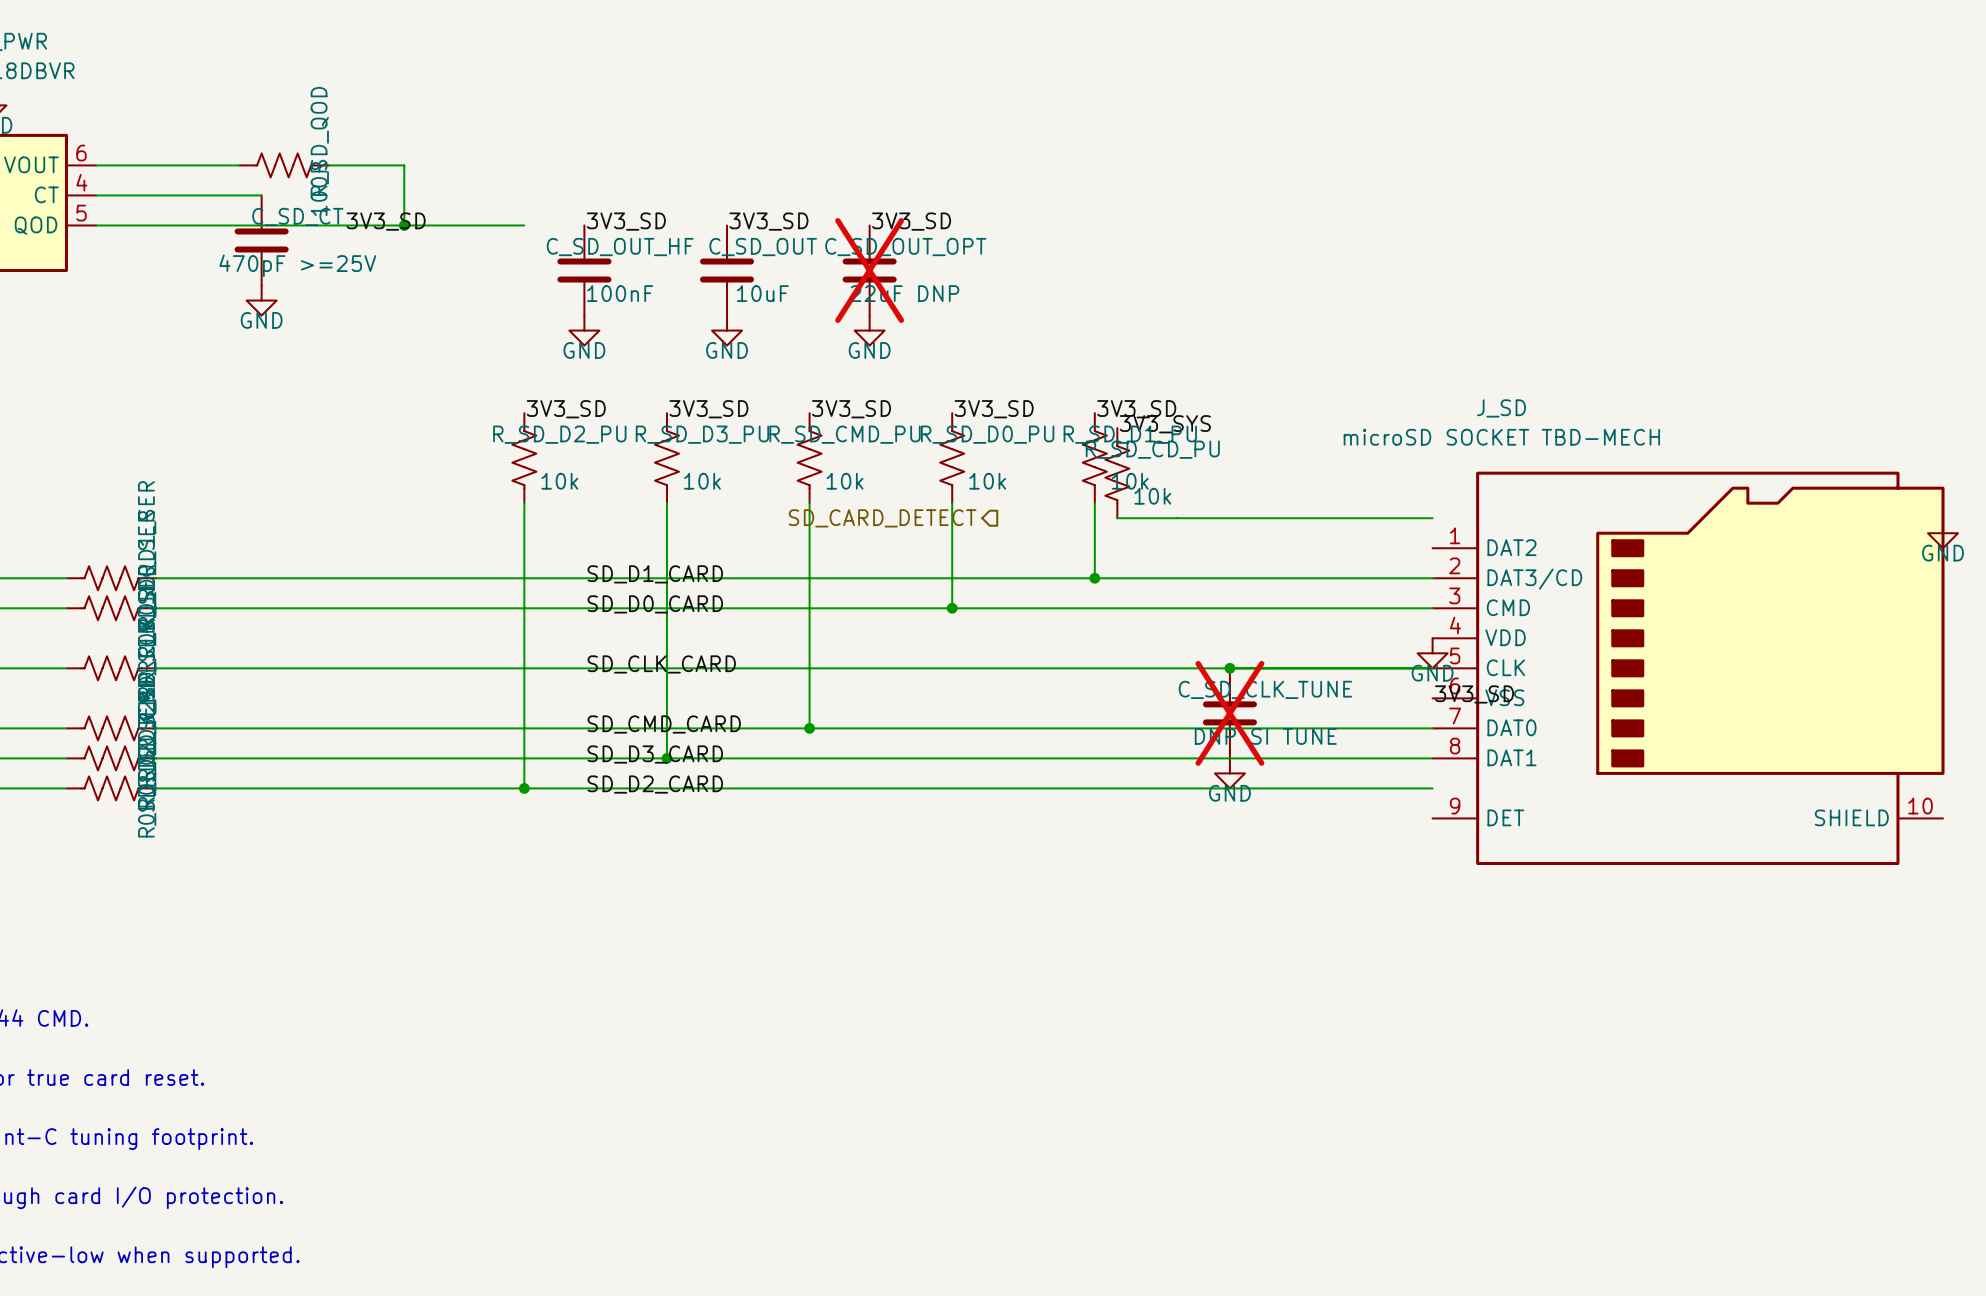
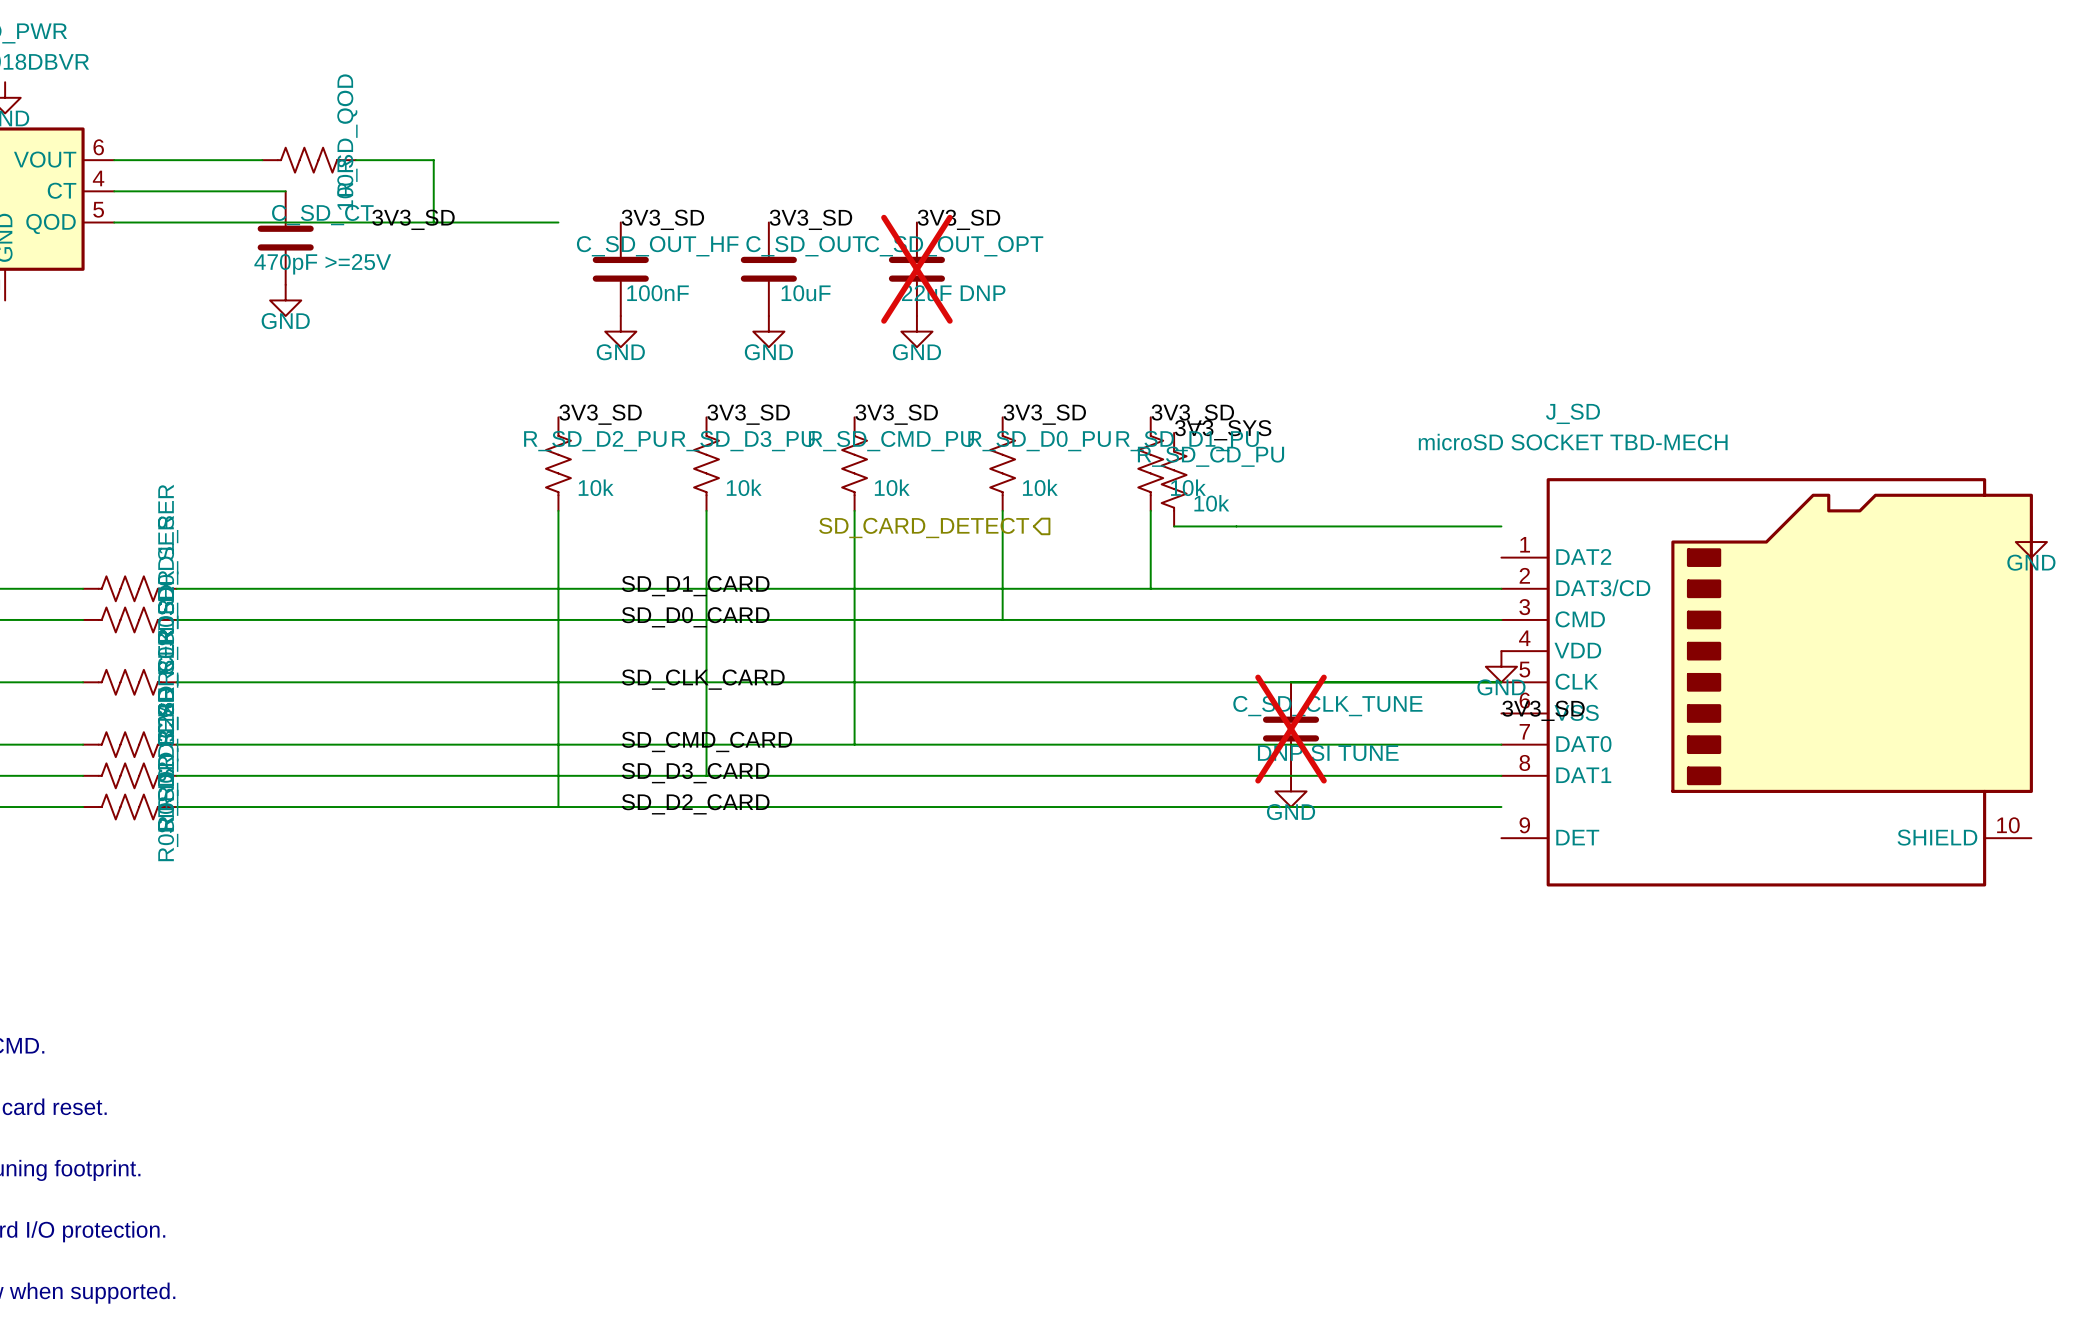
junction: (404, 225) -> none
junction: (1094, 578) -> none
junction: (952, 608) -> none
junction: (1229, 668) -> none
junction: (809, 728) -> none
junction: (666, 758) -> none
junction: (524, 788) -> none

